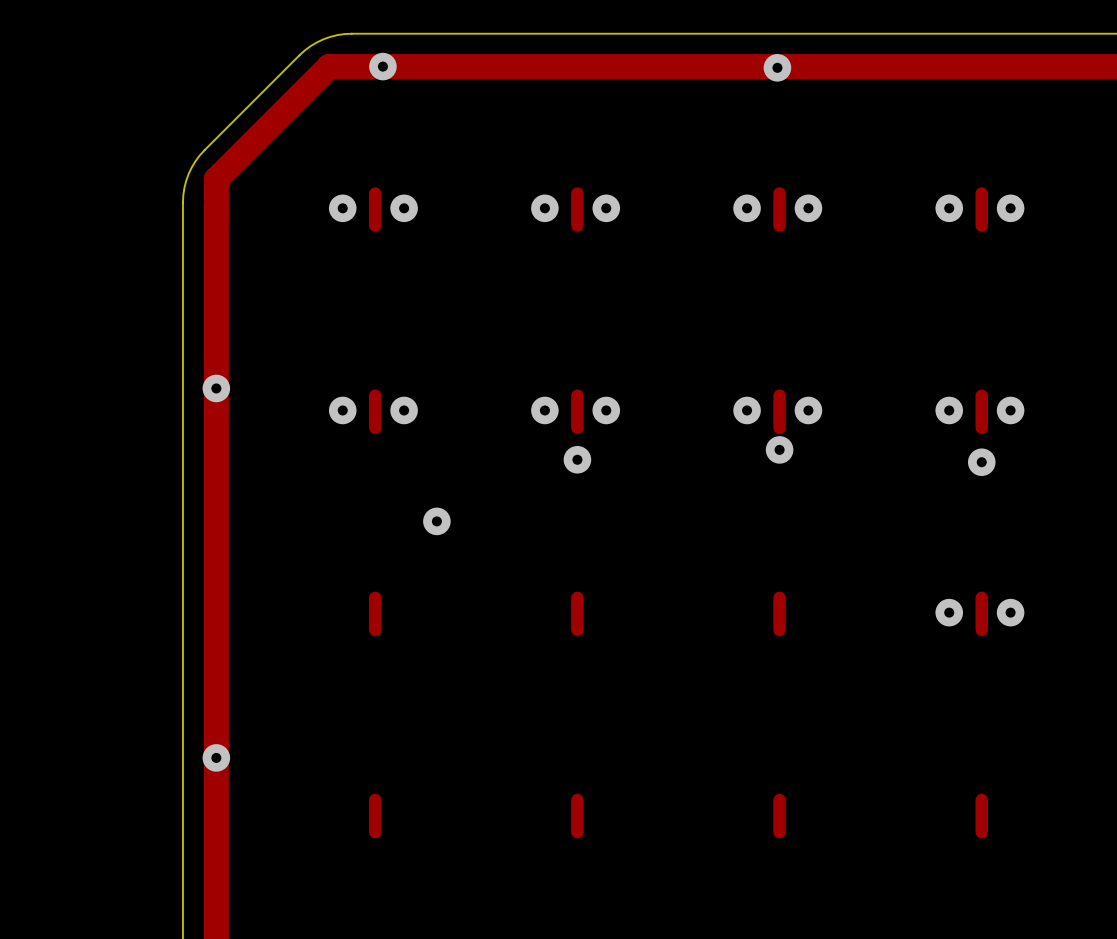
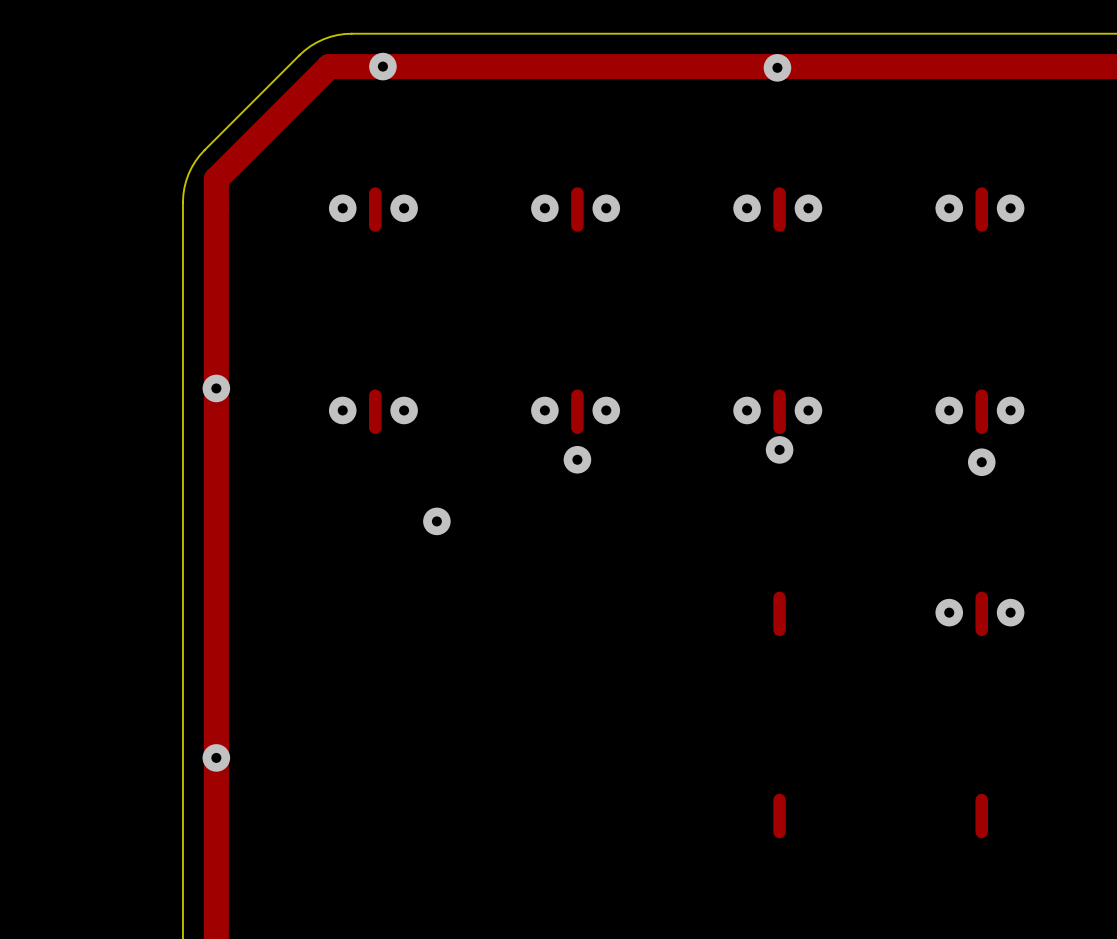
track: (375, 597) (375, 629) -> none
track: (577, 597) (577, 629) -> none
track: (375, 799) (375, 832) -> none
track: (577, 799) (577, 832) -> none

